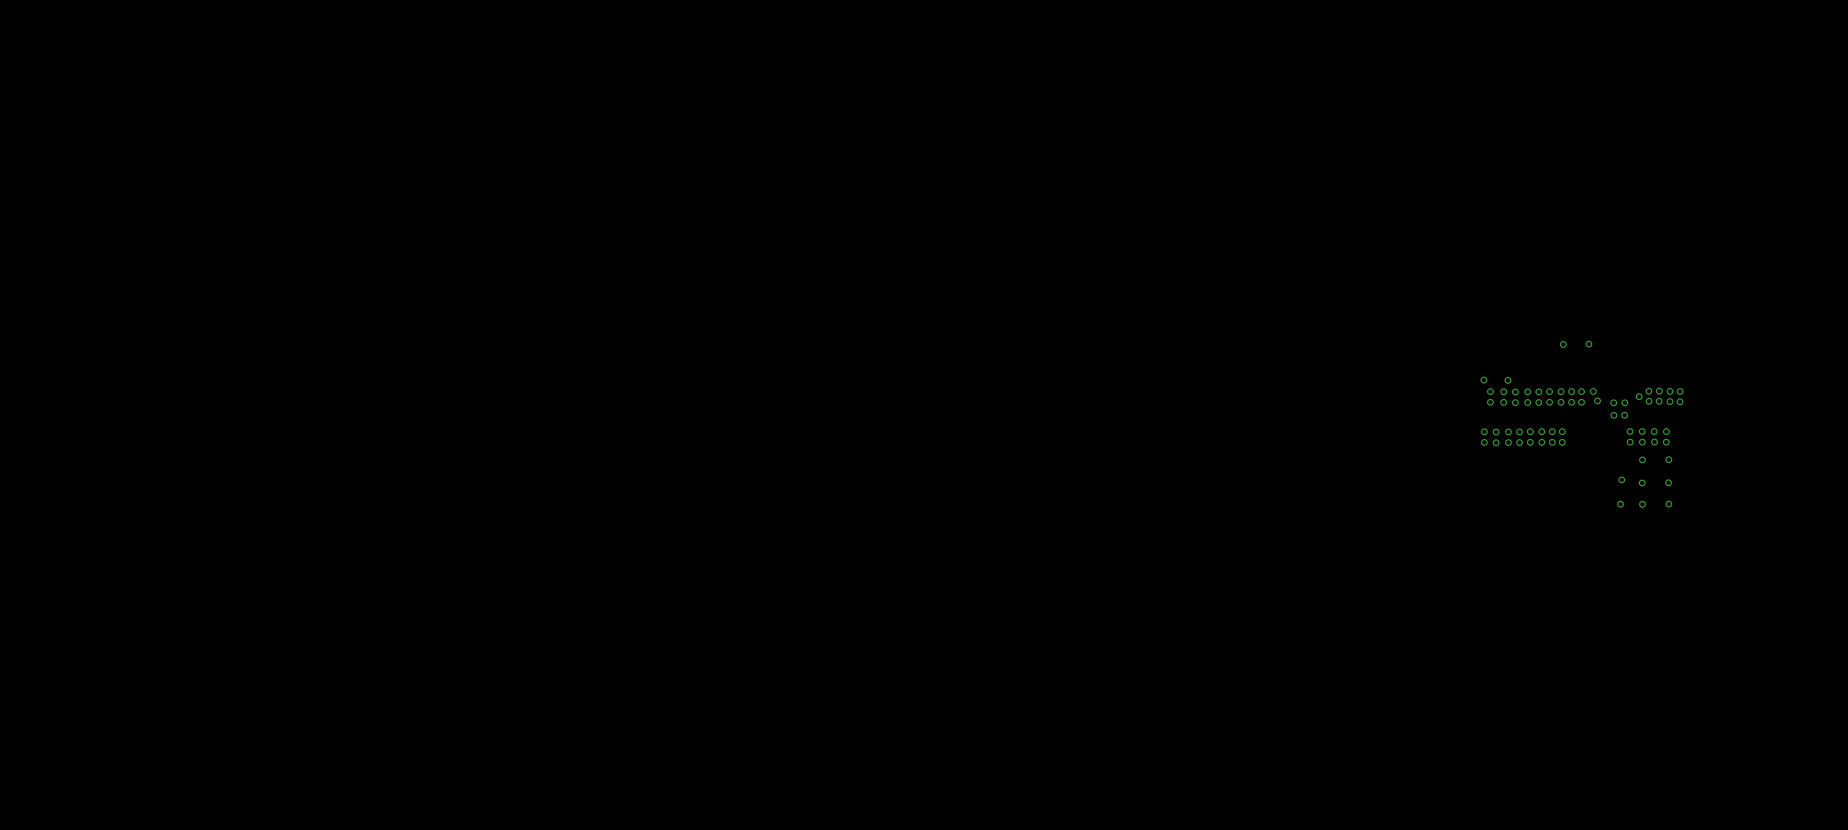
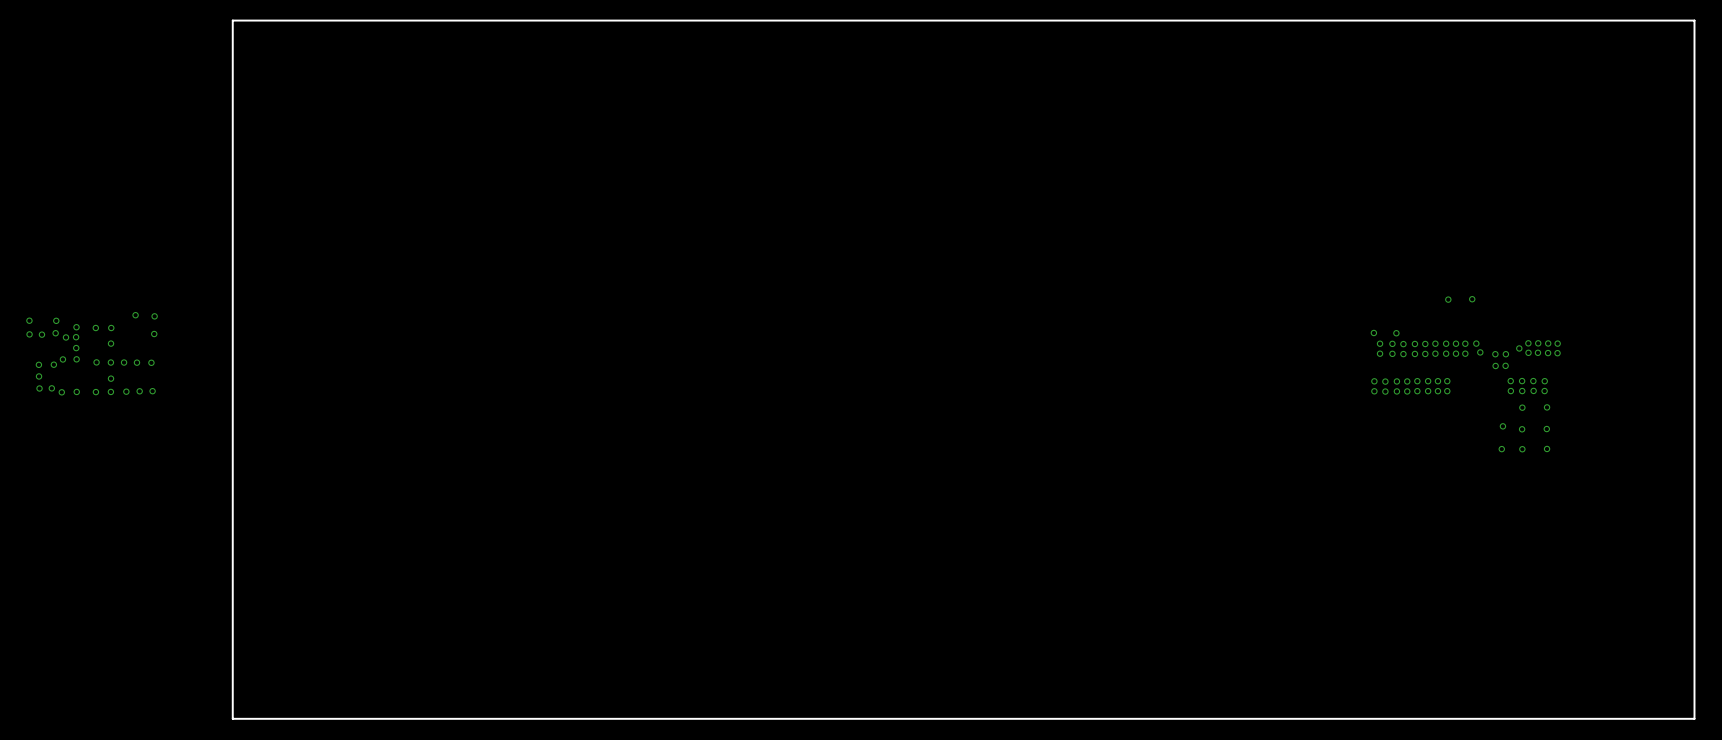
board edge: none -> (1694, 20) (1694, 718) (232, 718) (232, 20) (1694, 20)
part: none -> (135, 315)
part: none -> (154, 316)
part: none -> (29, 320)
part: none -> (56, 320)
part: none -> (76, 327)
part: none -> (95, 328)
part: none -> (111, 328)
part: none -> (55, 333)
part: none -> (29, 334)
part: none -> (41, 334)
part: none -> (154, 334)
part: none -> (66, 337)
part: none -> (76, 337)
part: none -> (111, 343)
part: none -> (76, 348)
part: none -> (62, 359)
part: none -> (76, 359)
part: none -> (96, 362)
part: none -> (110, 362)
part: none -> (124, 362)
part: none -> (136, 362)
part: none -> (151, 362)
part: none -> (38, 364)
part: none -> (53, 364)
part: none -> (39, 376)
part: none -> (111, 378)
part: none -> (39, 388)
part: none -> (51, 388)
part: none -> (126, 391)
part: none -> (139, 391)
part: none -> (152, 391)
part: none -> (61, 392)
part: none -> (76, 391)
part: none -> (95, 392)
part: none -> (110, 391)

